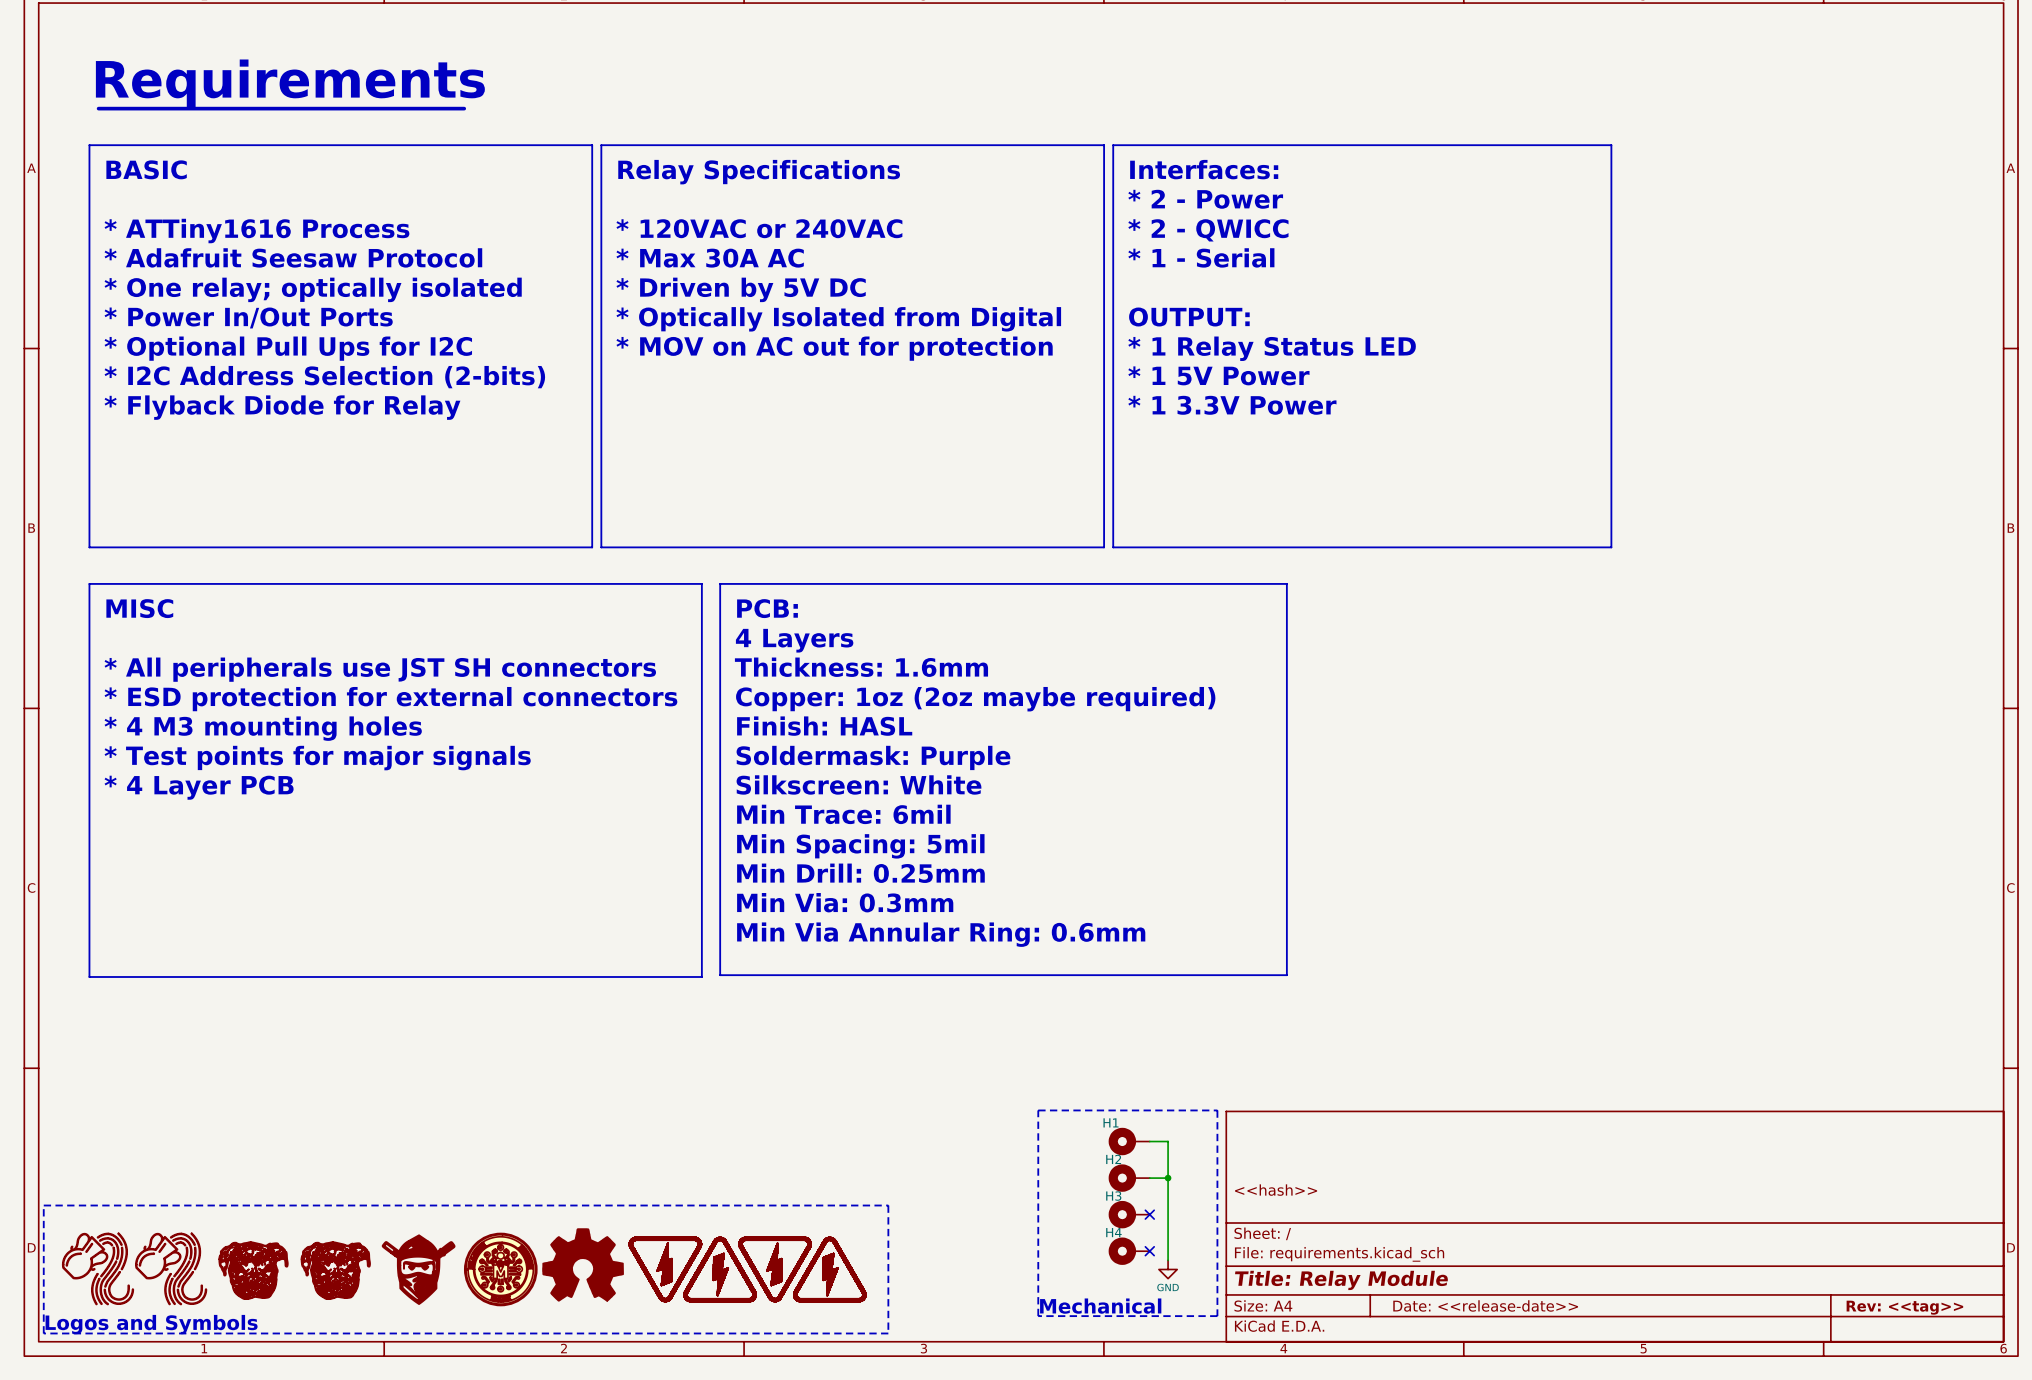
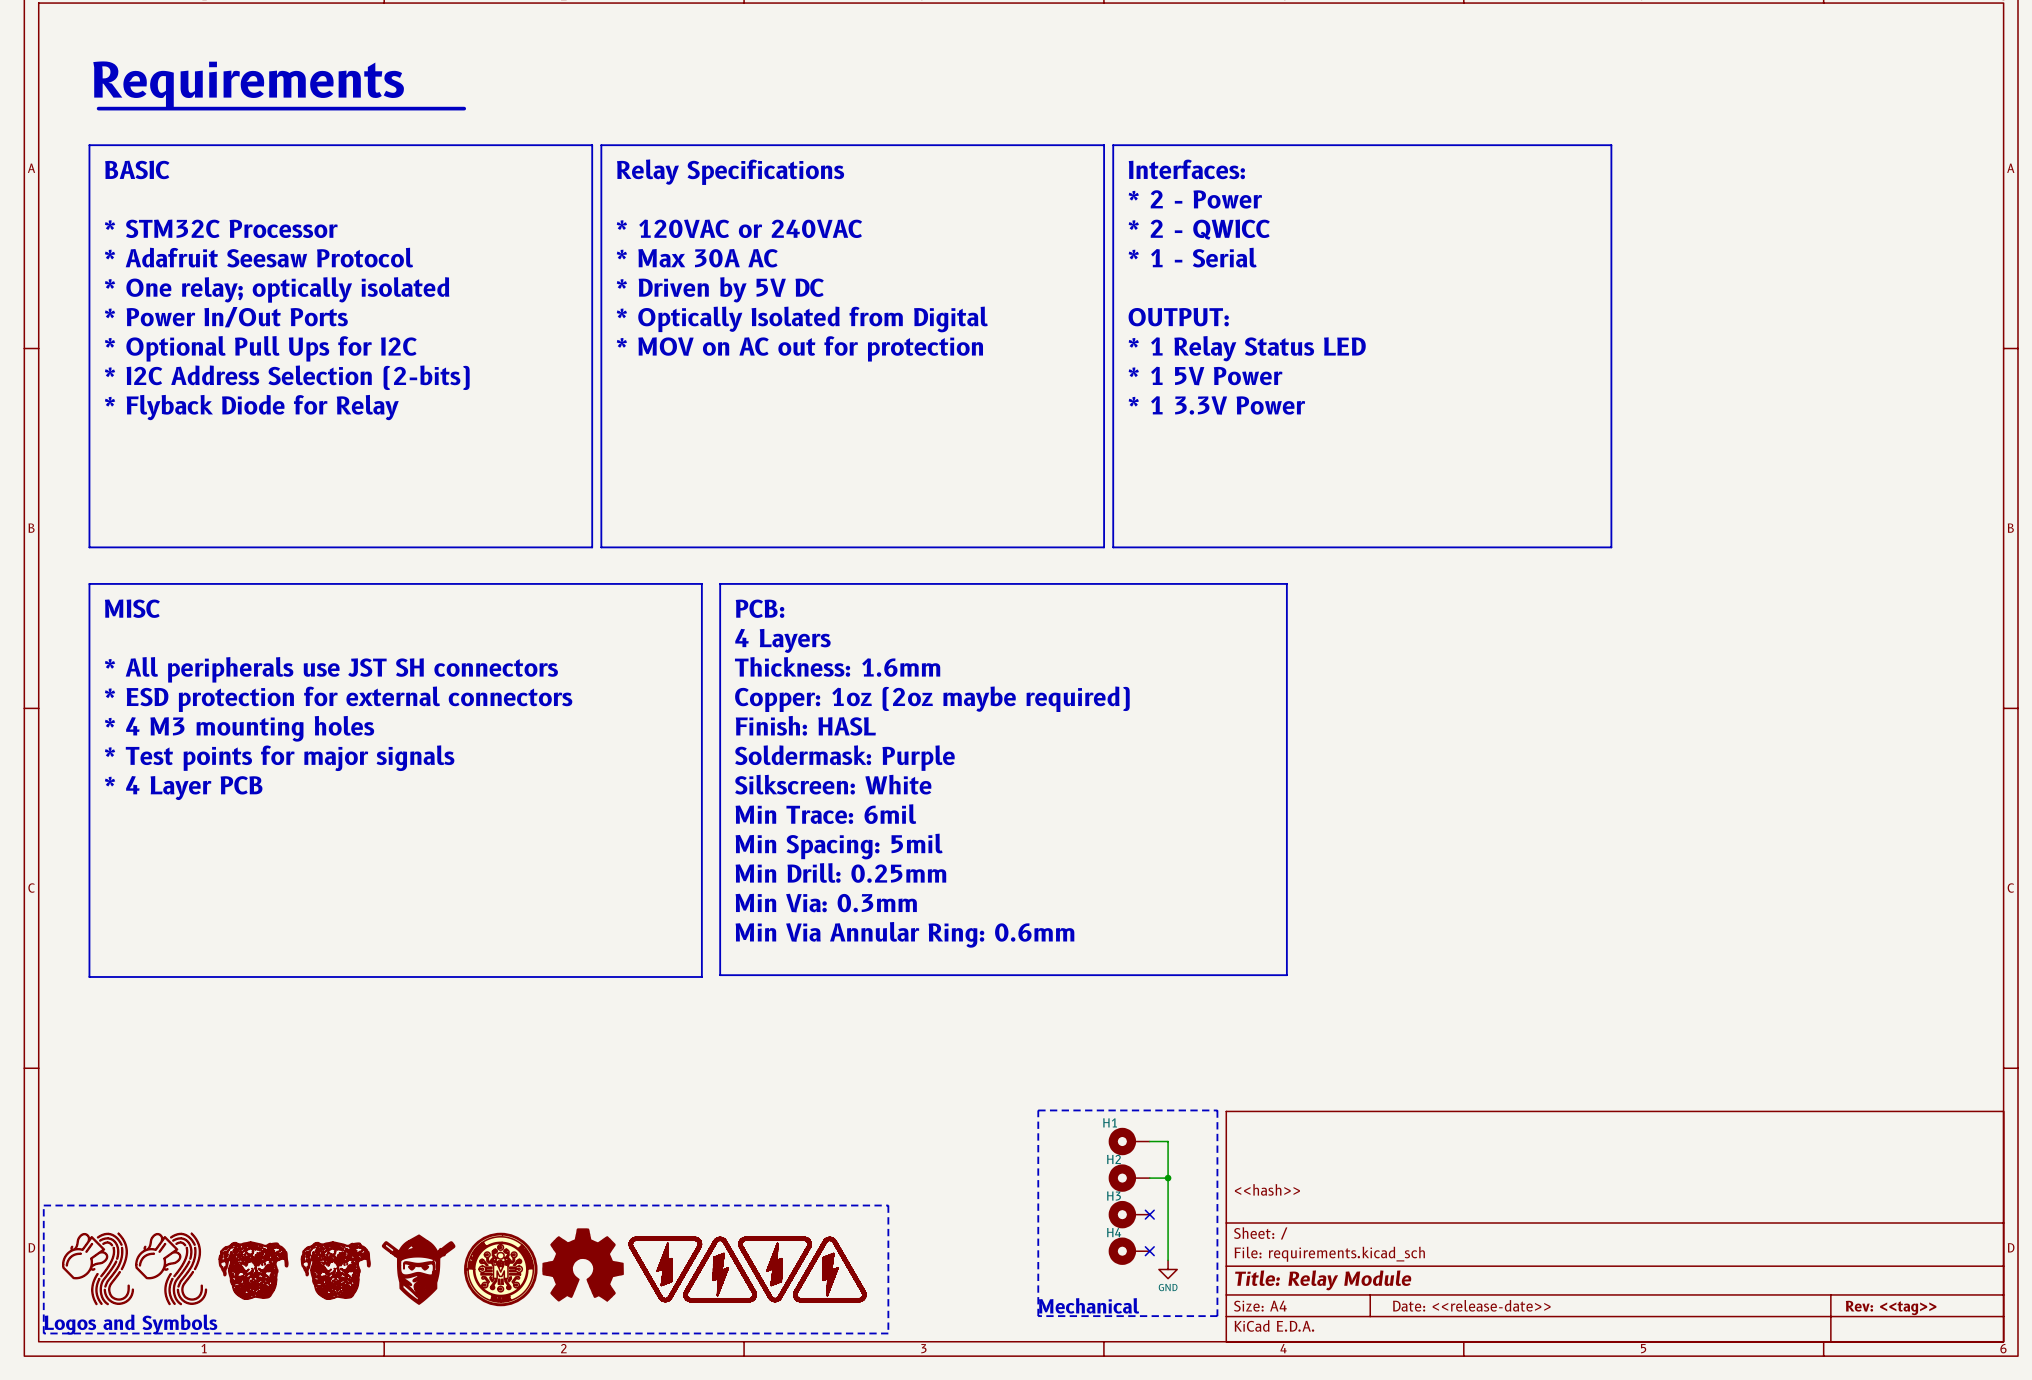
text: * ATTiny1616 Process (256, 231) -> * STM32C Processor (221, 228)

